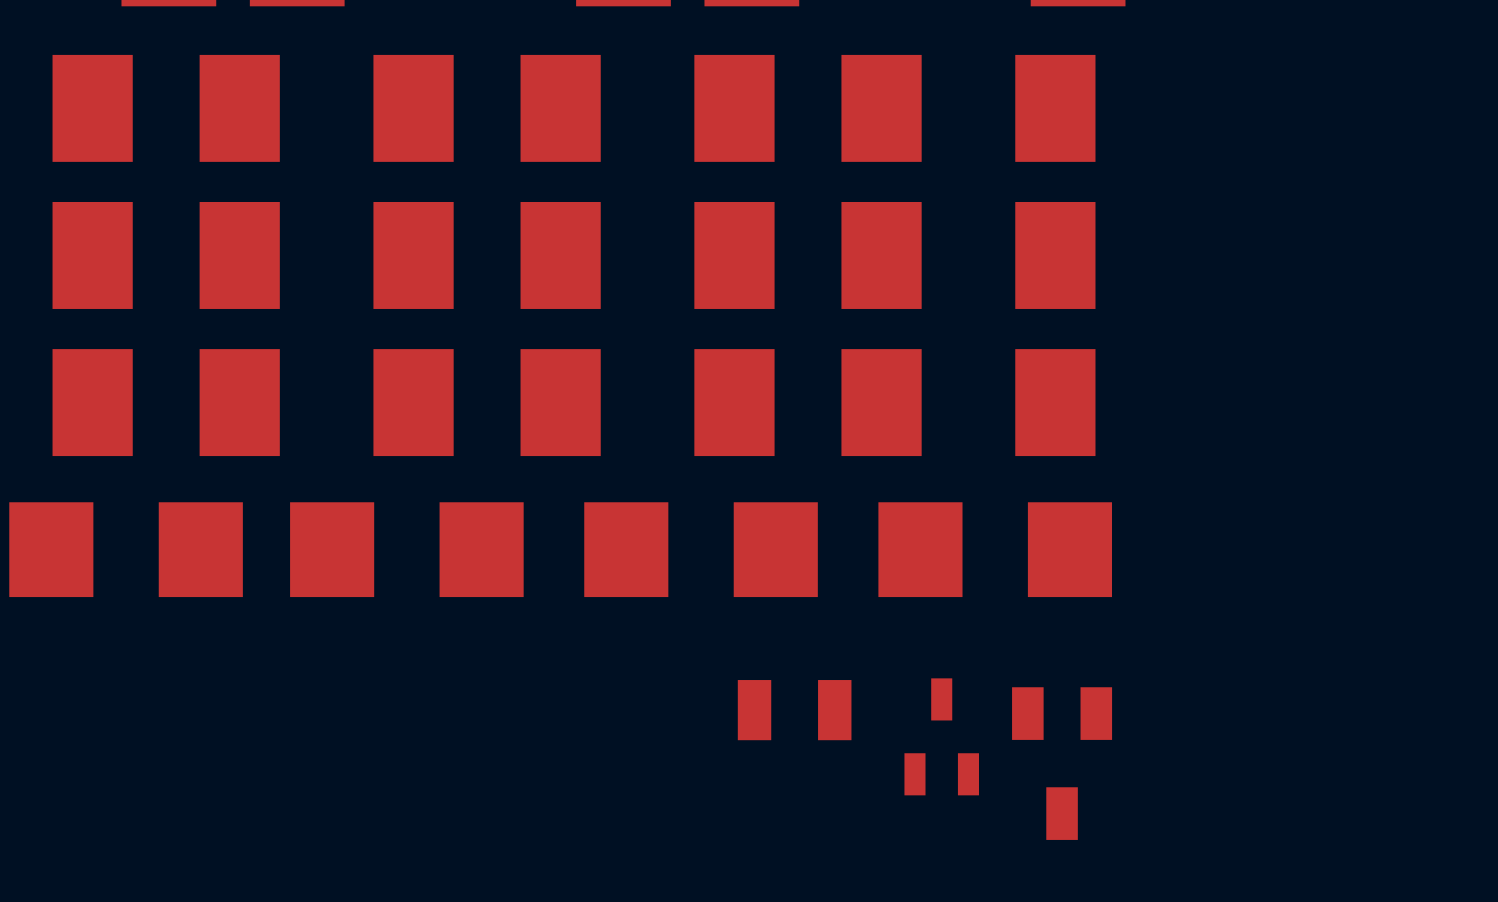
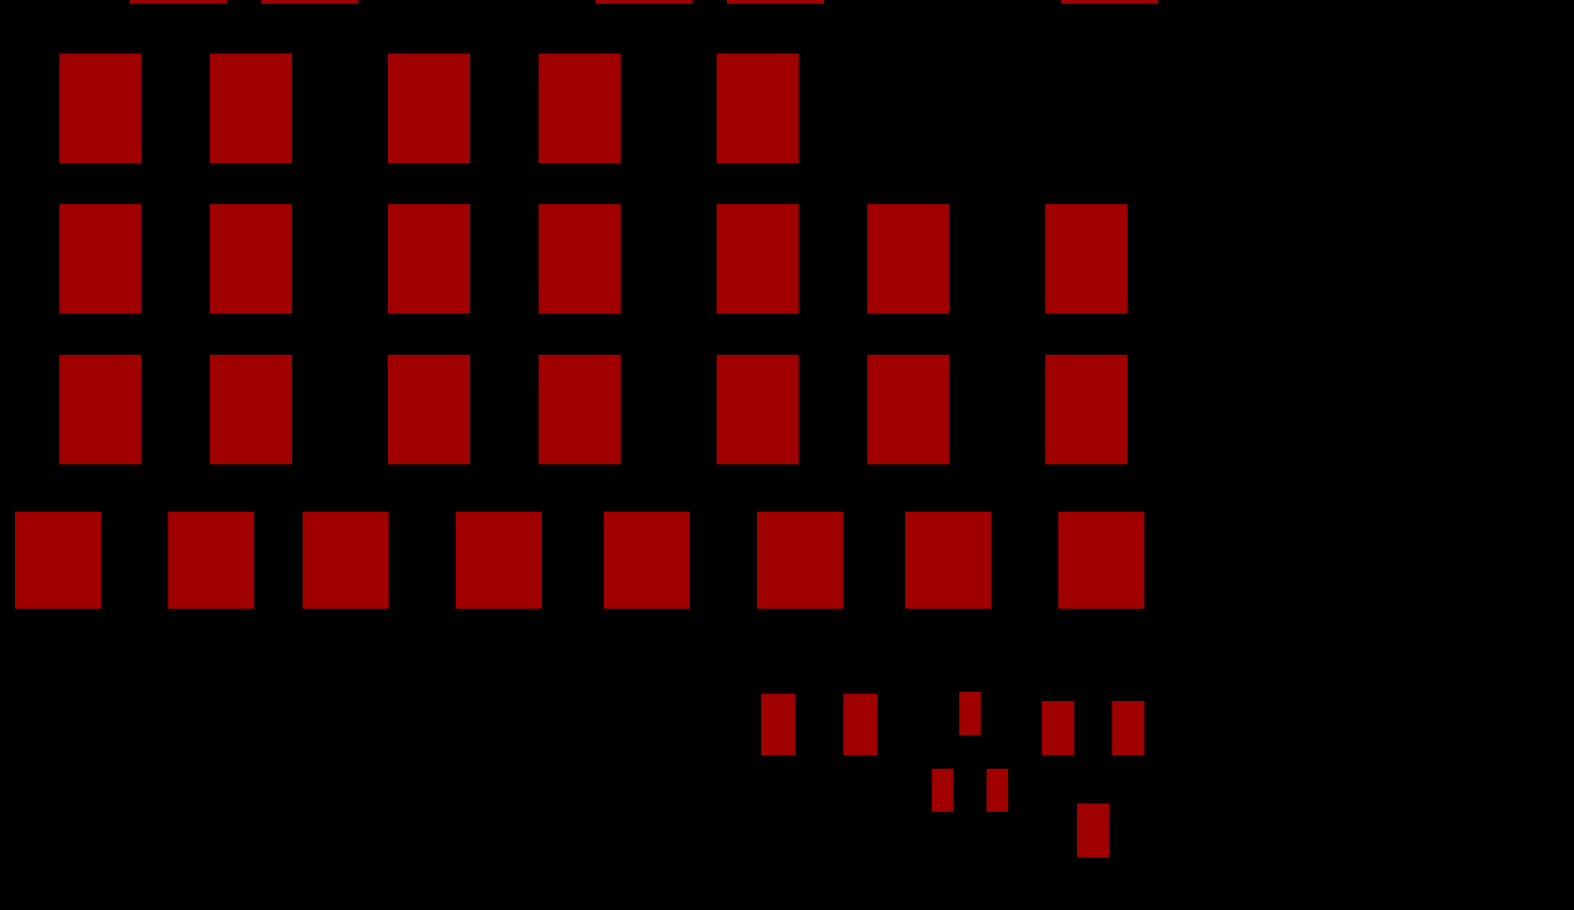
part: (968, 108) -> none

